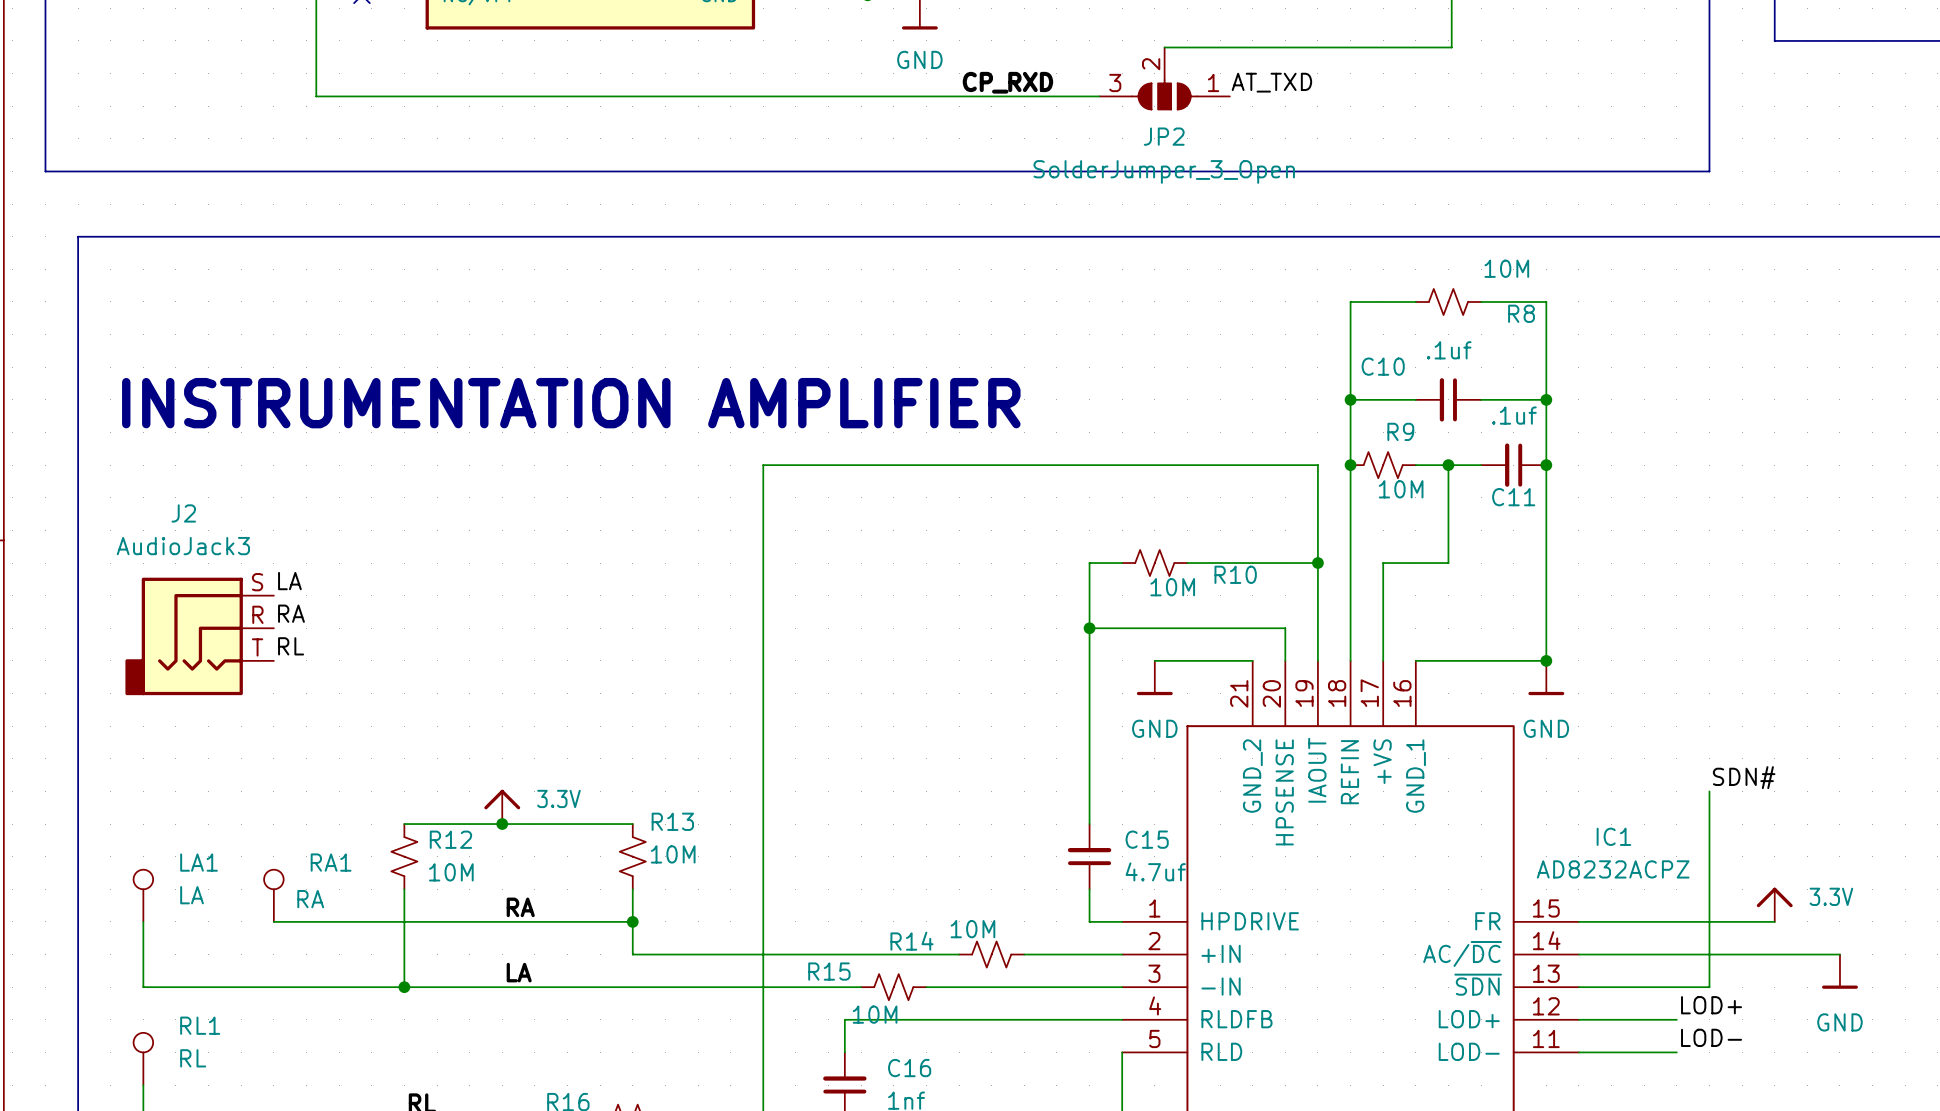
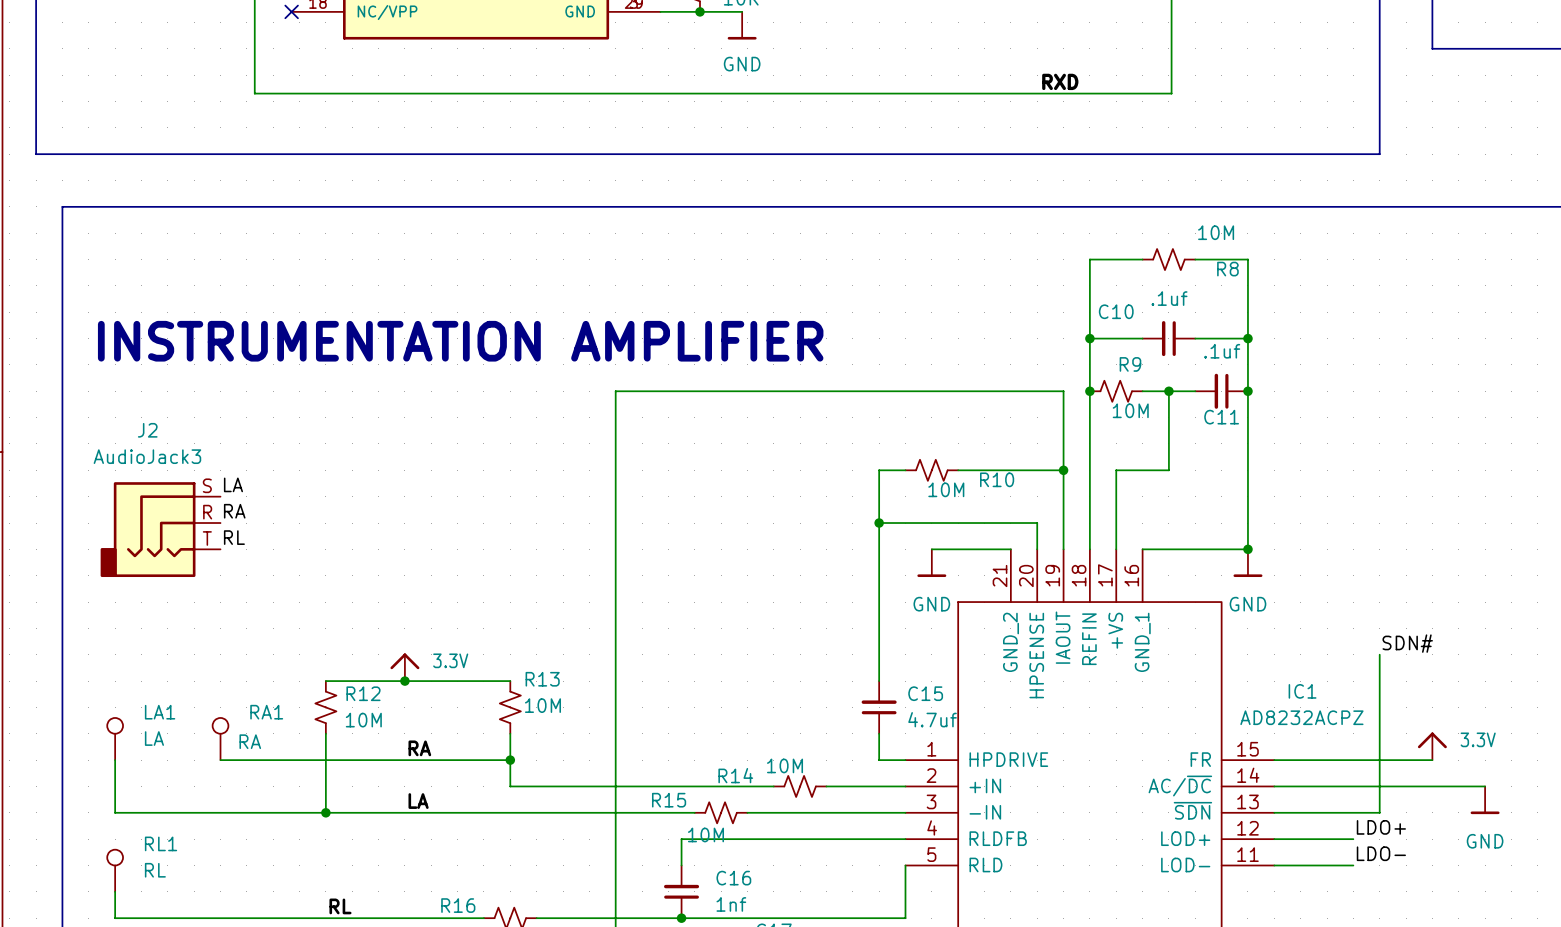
wire: (1164, 47) (1451, 47) -> (887, 93) (1171, 93) (1171, 54)
JP2: SolderJumper_3_Open (1164, 78) -> none
label: none -> RXD (1060, 81)
label: CP_RXD (1007, 82) -> none
label: AT_TXD (1271, 82) -> none
label: LOD+ (1711, 1005) -> LDO+ (1381, 827)
label: LOD- (1711, 1037) -> LDO- (1381, 853)

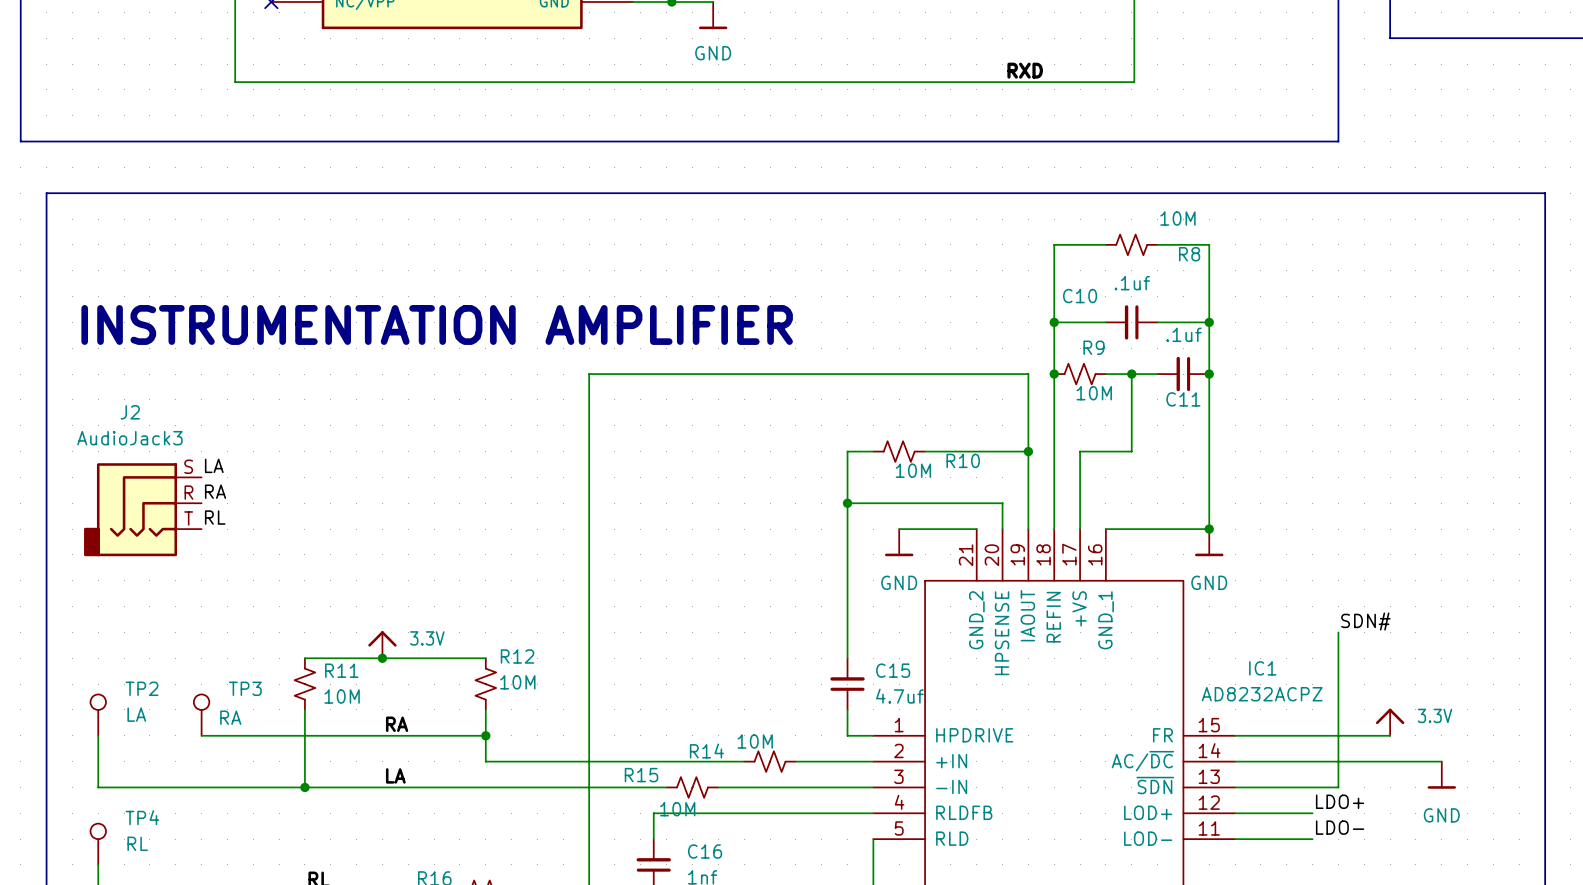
R13 name: R13 (542, 679) -> R12 (517, 656)
R12 name: R12 (363, 693) -> R11 (341, 670)
LA1 name: LA1 (160, 712) -> TP2 (142, 688)
RA1 name: RA1 (266, 712) -> TP3 (245, 688)
RL1 name: RL1 (161, 843) -> TP4 (142, 817)

